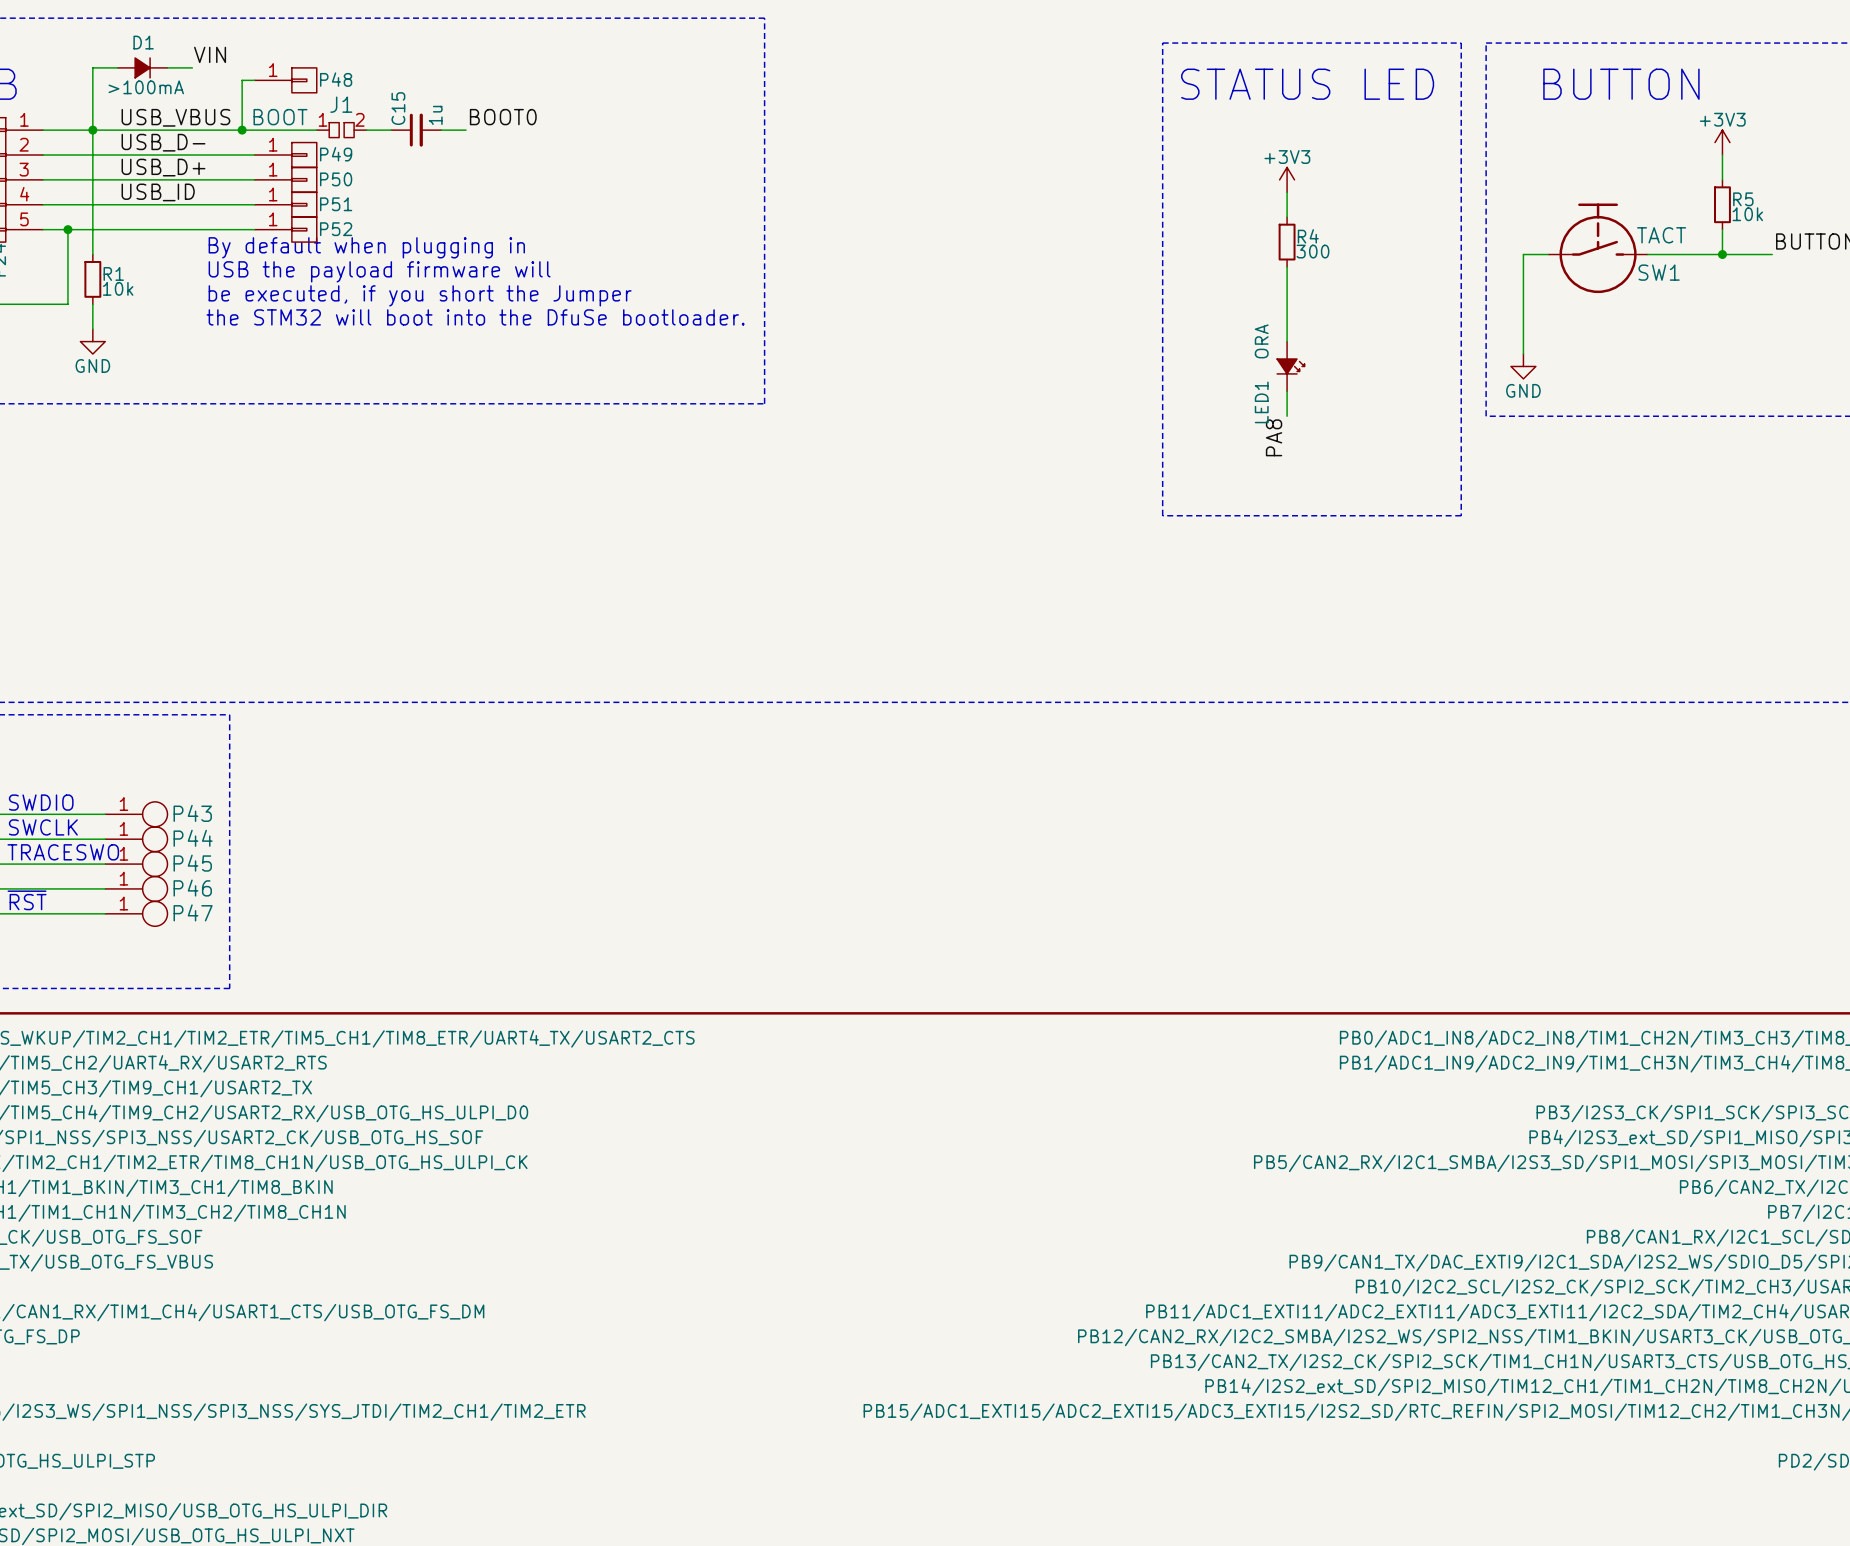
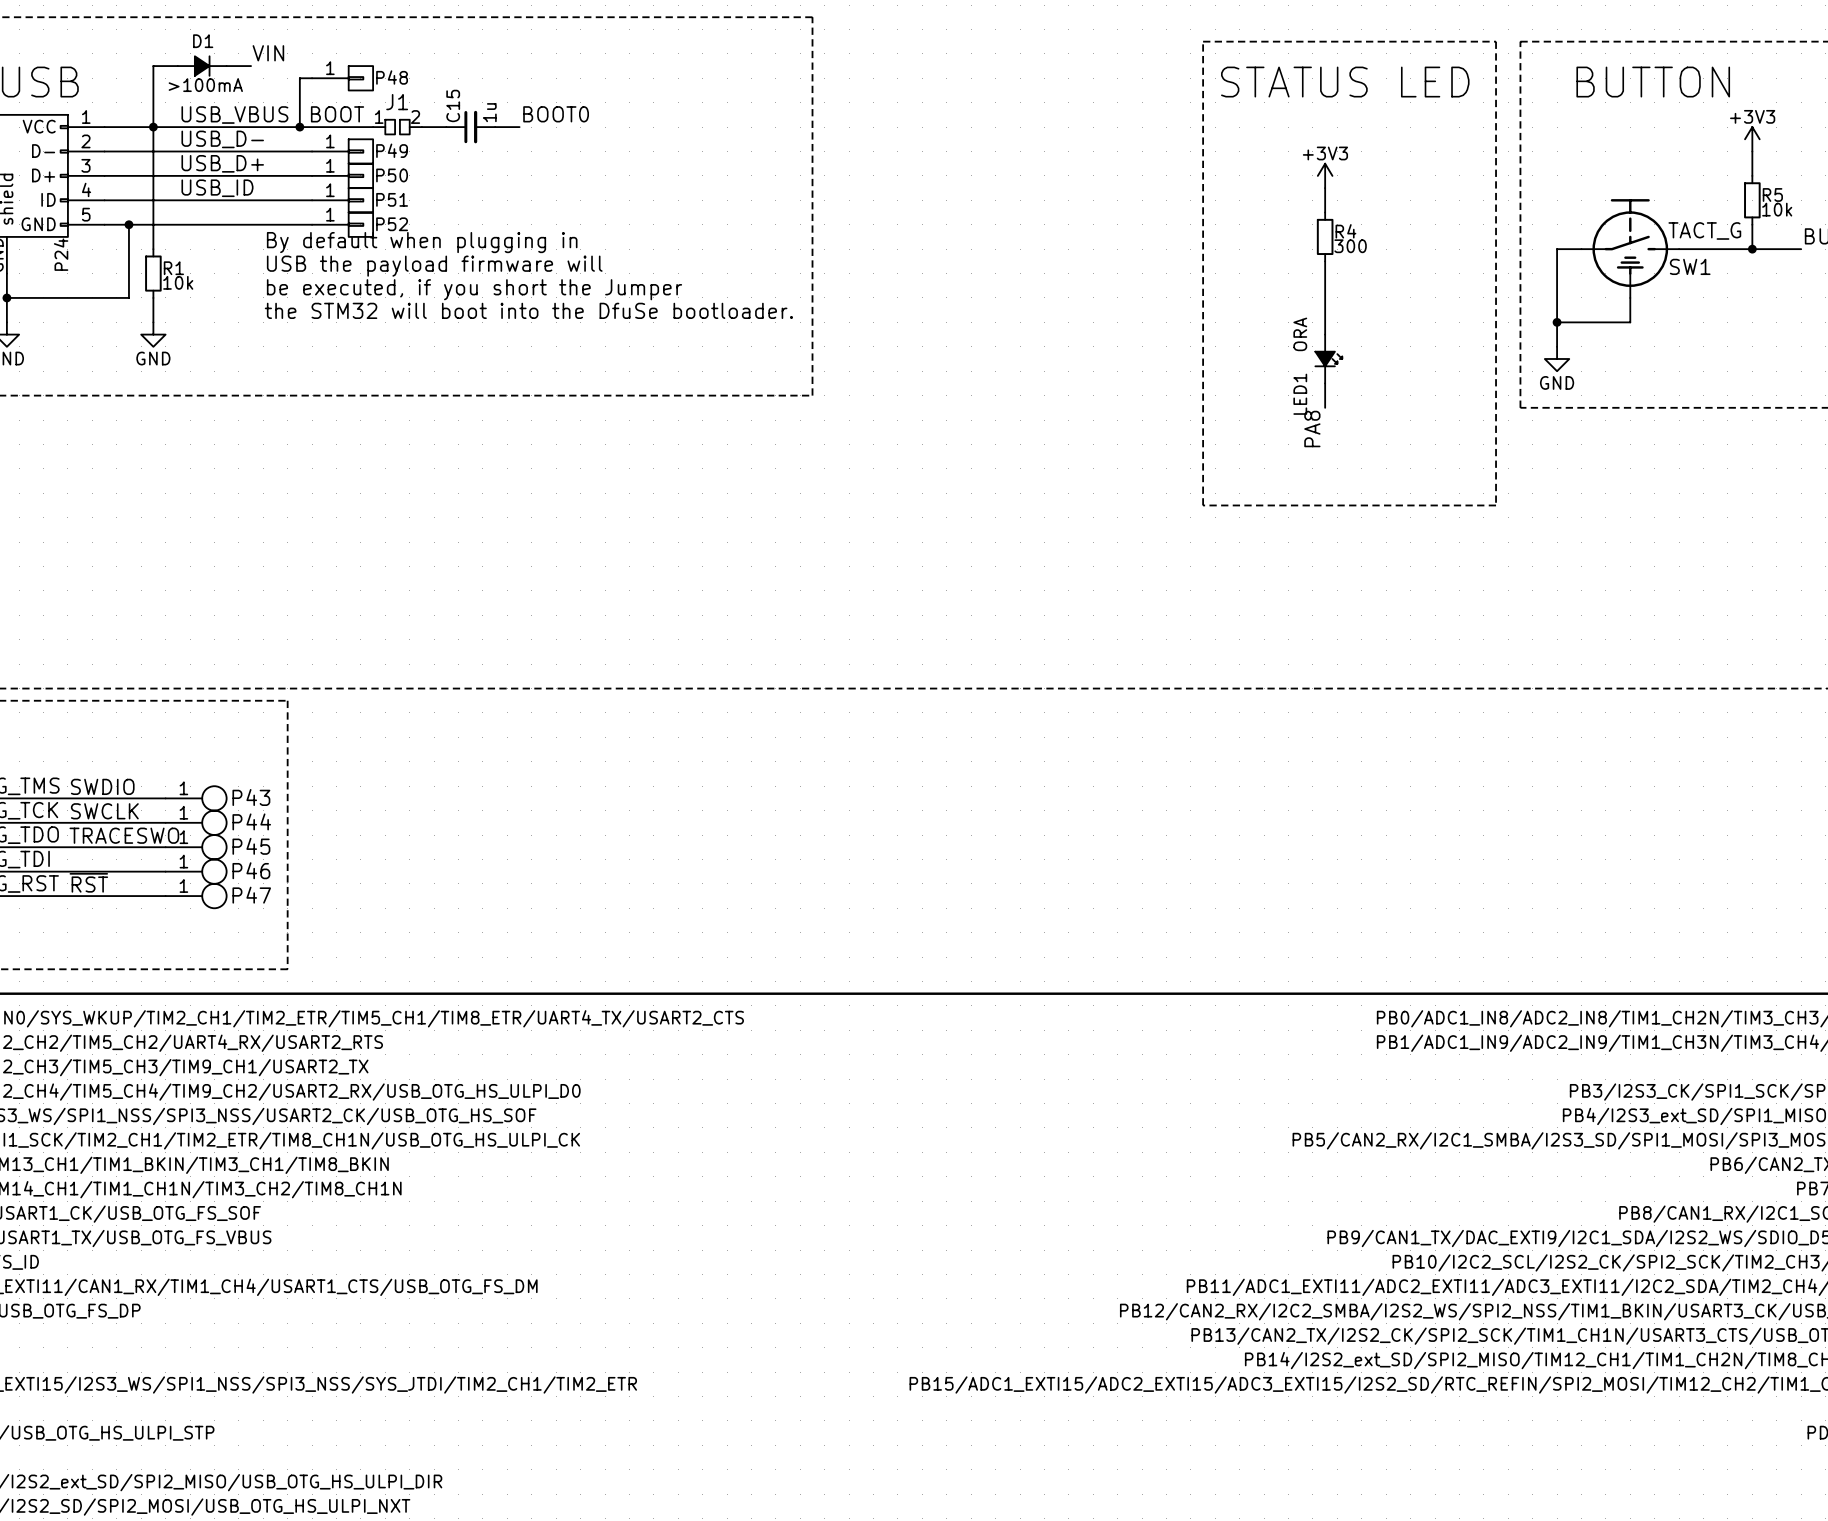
SW1 symbol: [1548, 203, 1648, 294] -> [1581, 199, 1680, 298]
SW1 value: TACT (1661, 235) -> TACT_G (1704, 230)
wire: none -> (1630, 297) (1630, 322) (1557, 322)
junction: none -> (1557, 322)

